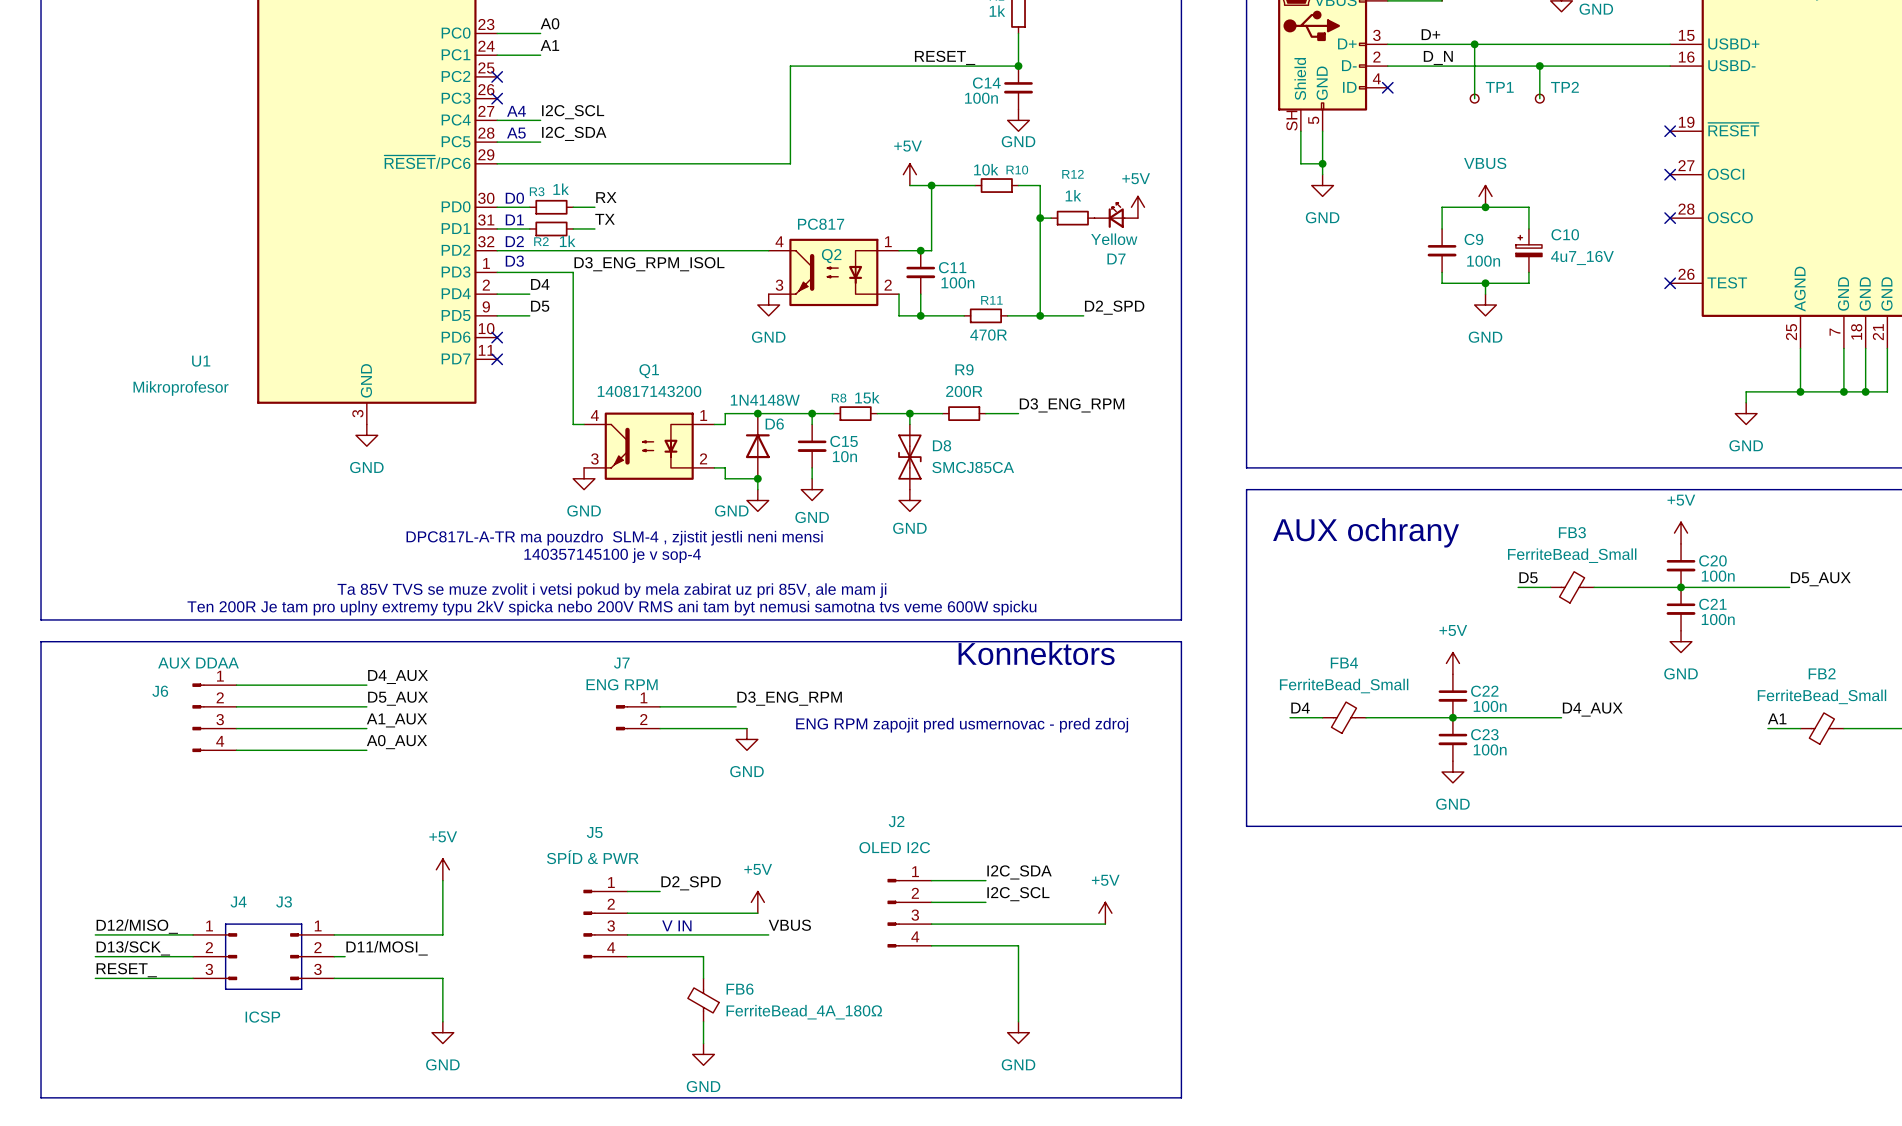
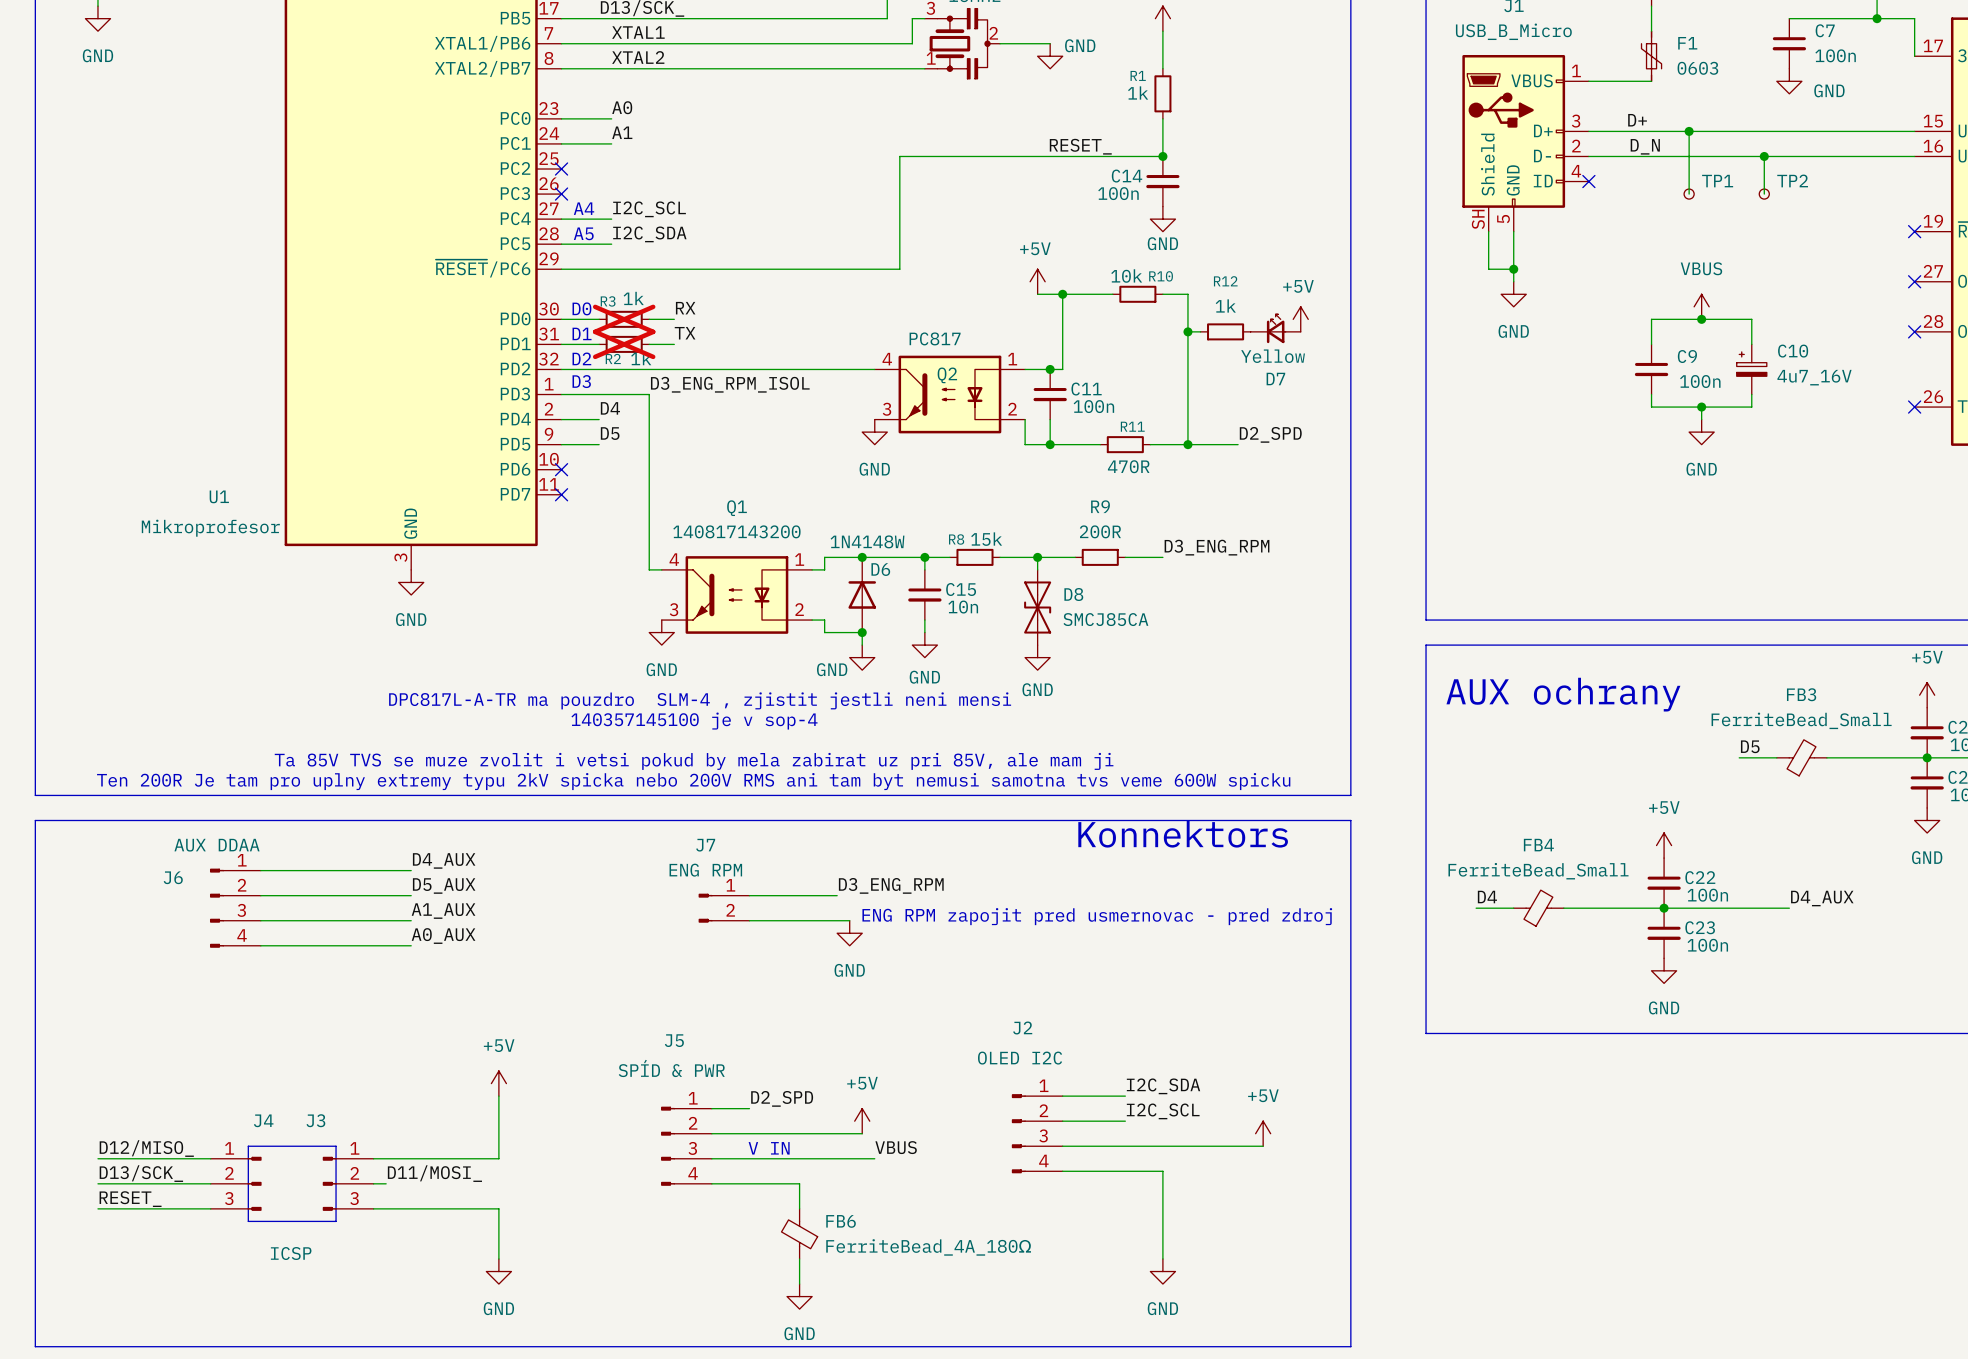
R3 do-not-place cross: none -> (624, 319)
R2 do-not-place cross: none -> (624, 344)

